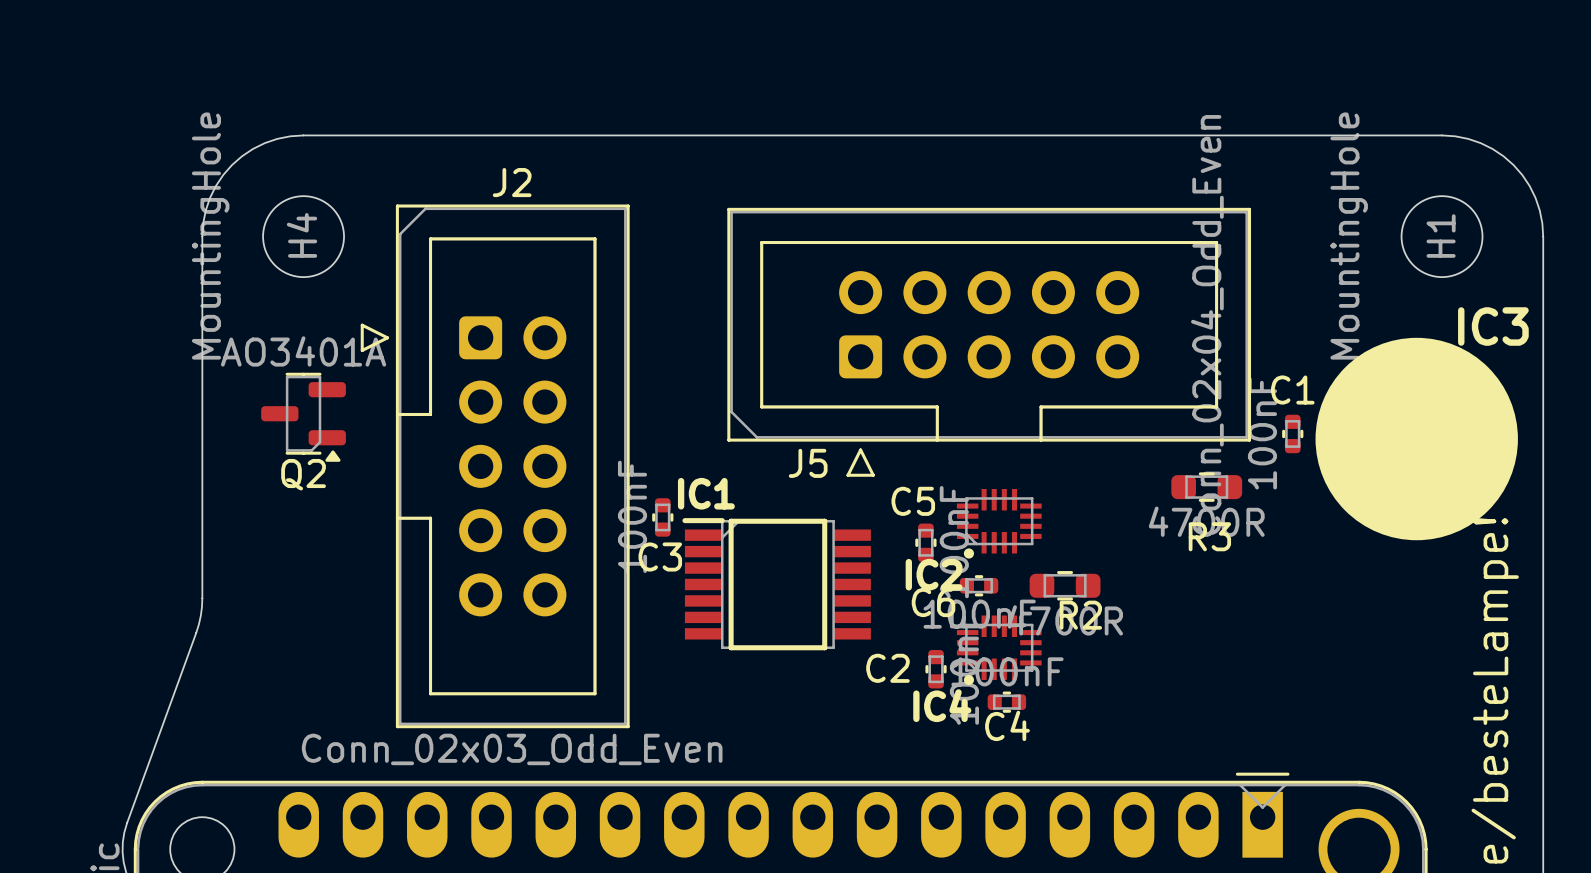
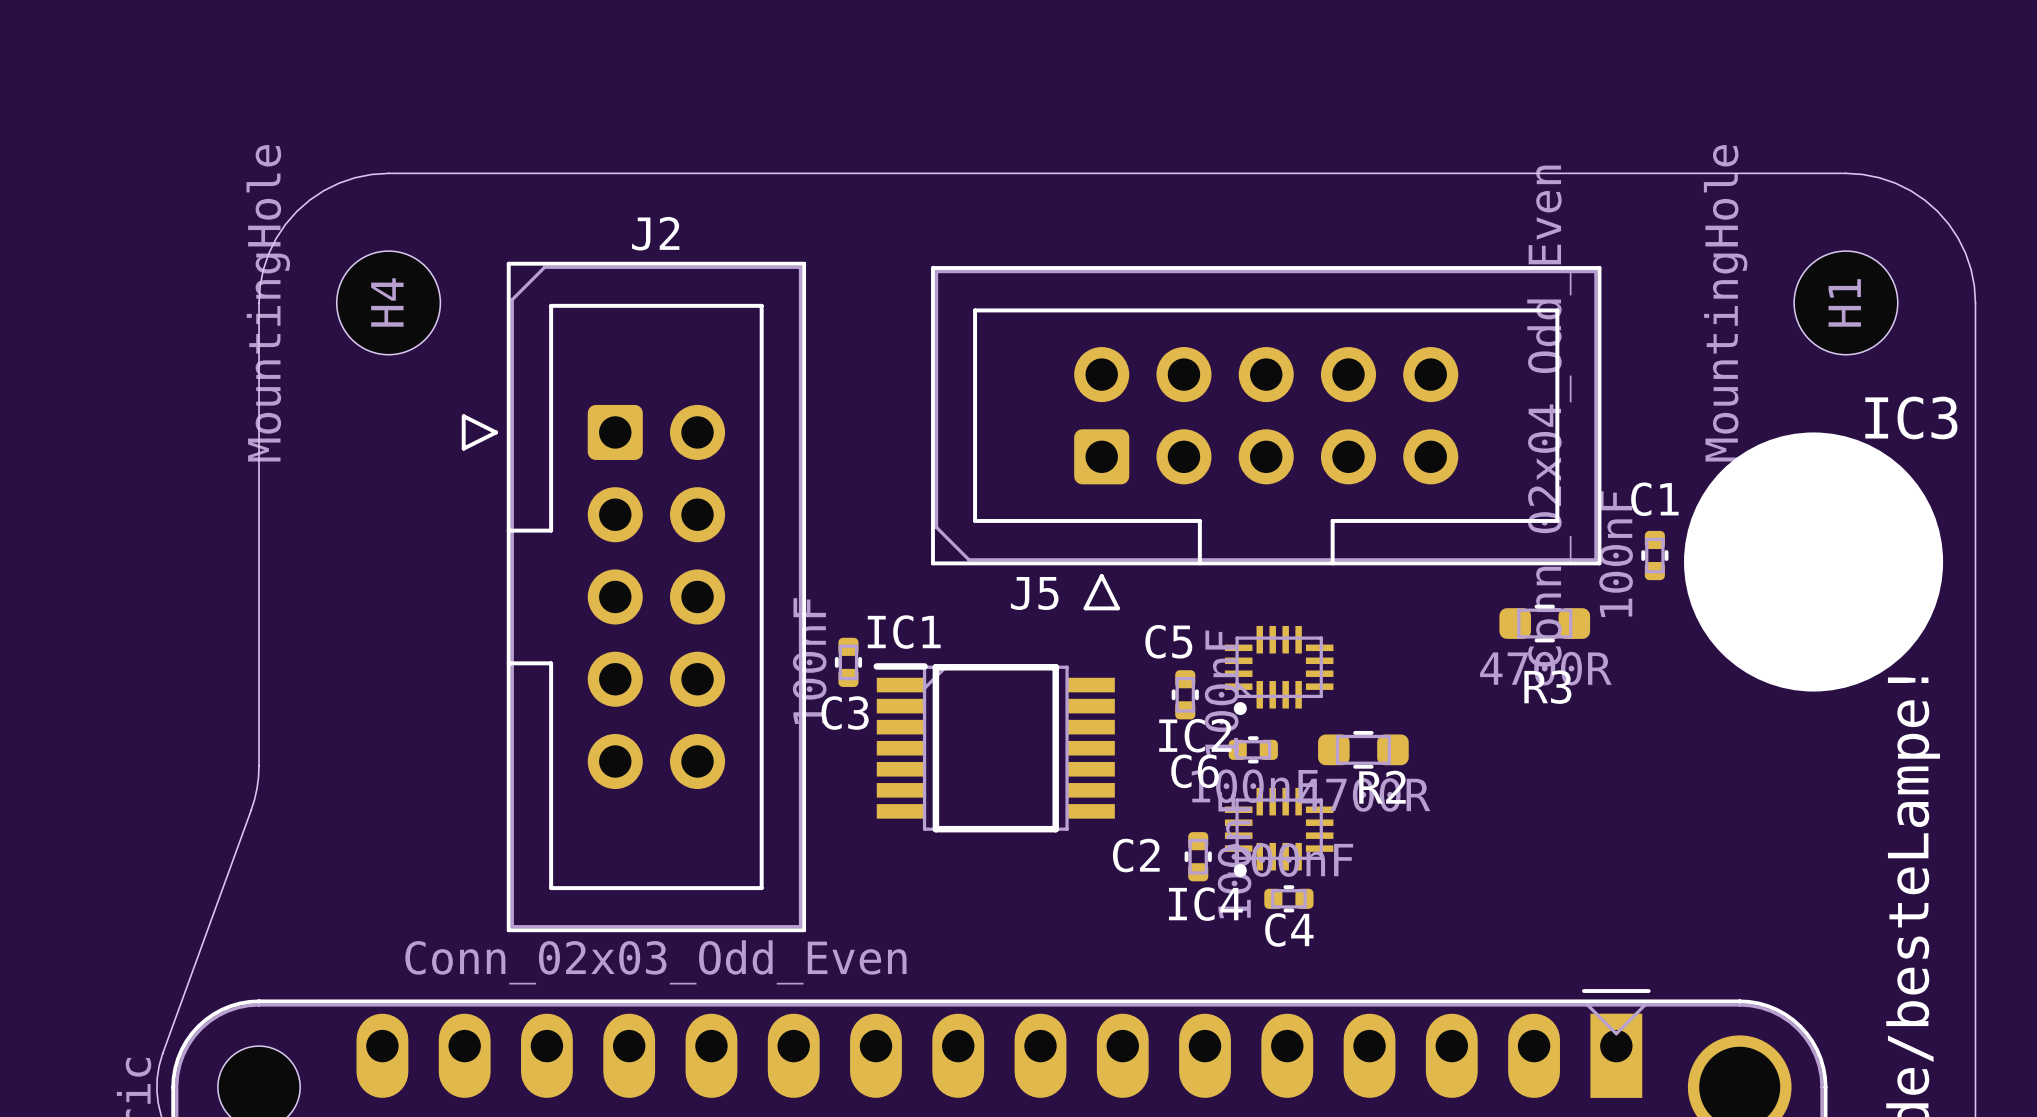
Q2: AO3401A (303, 417) -> none

